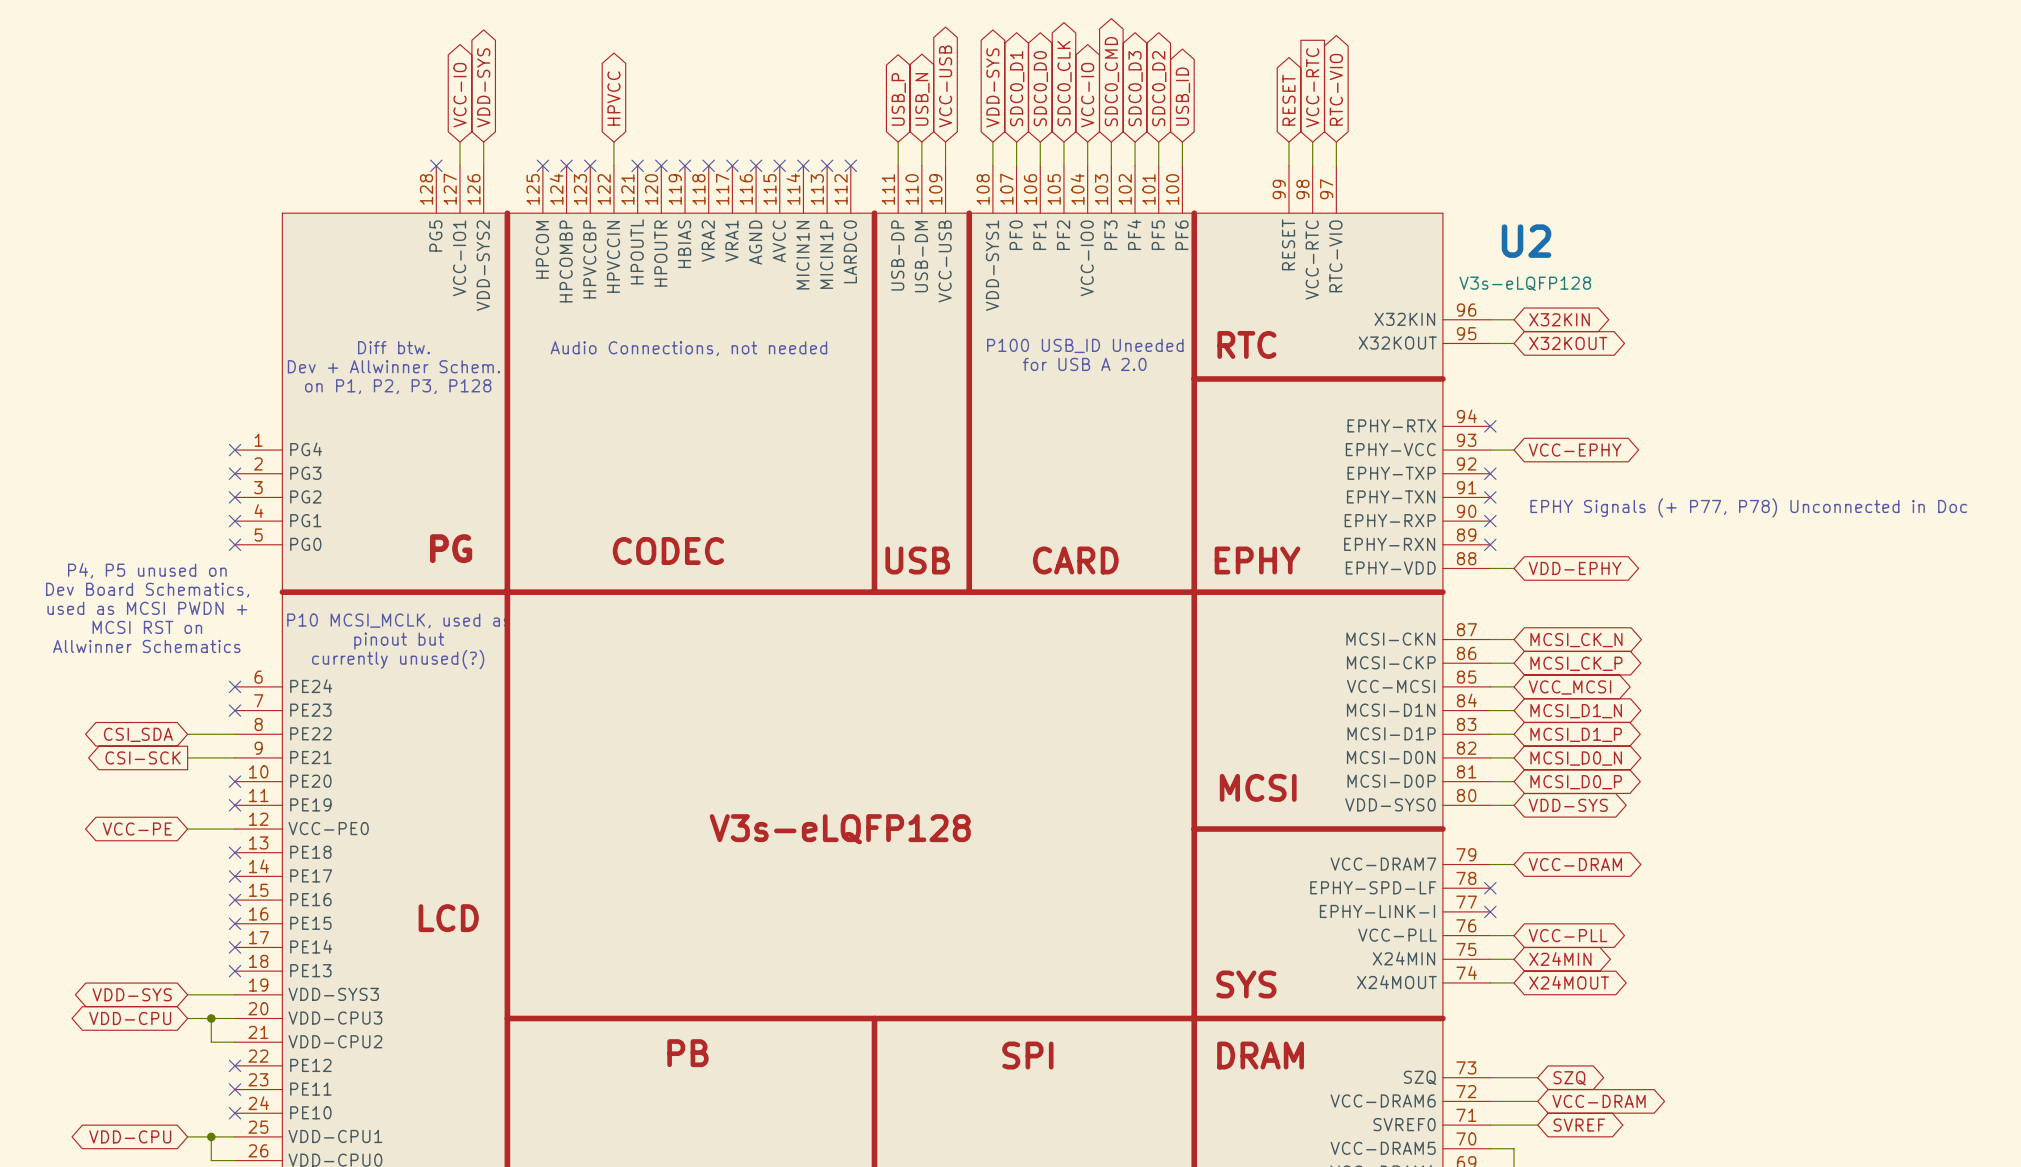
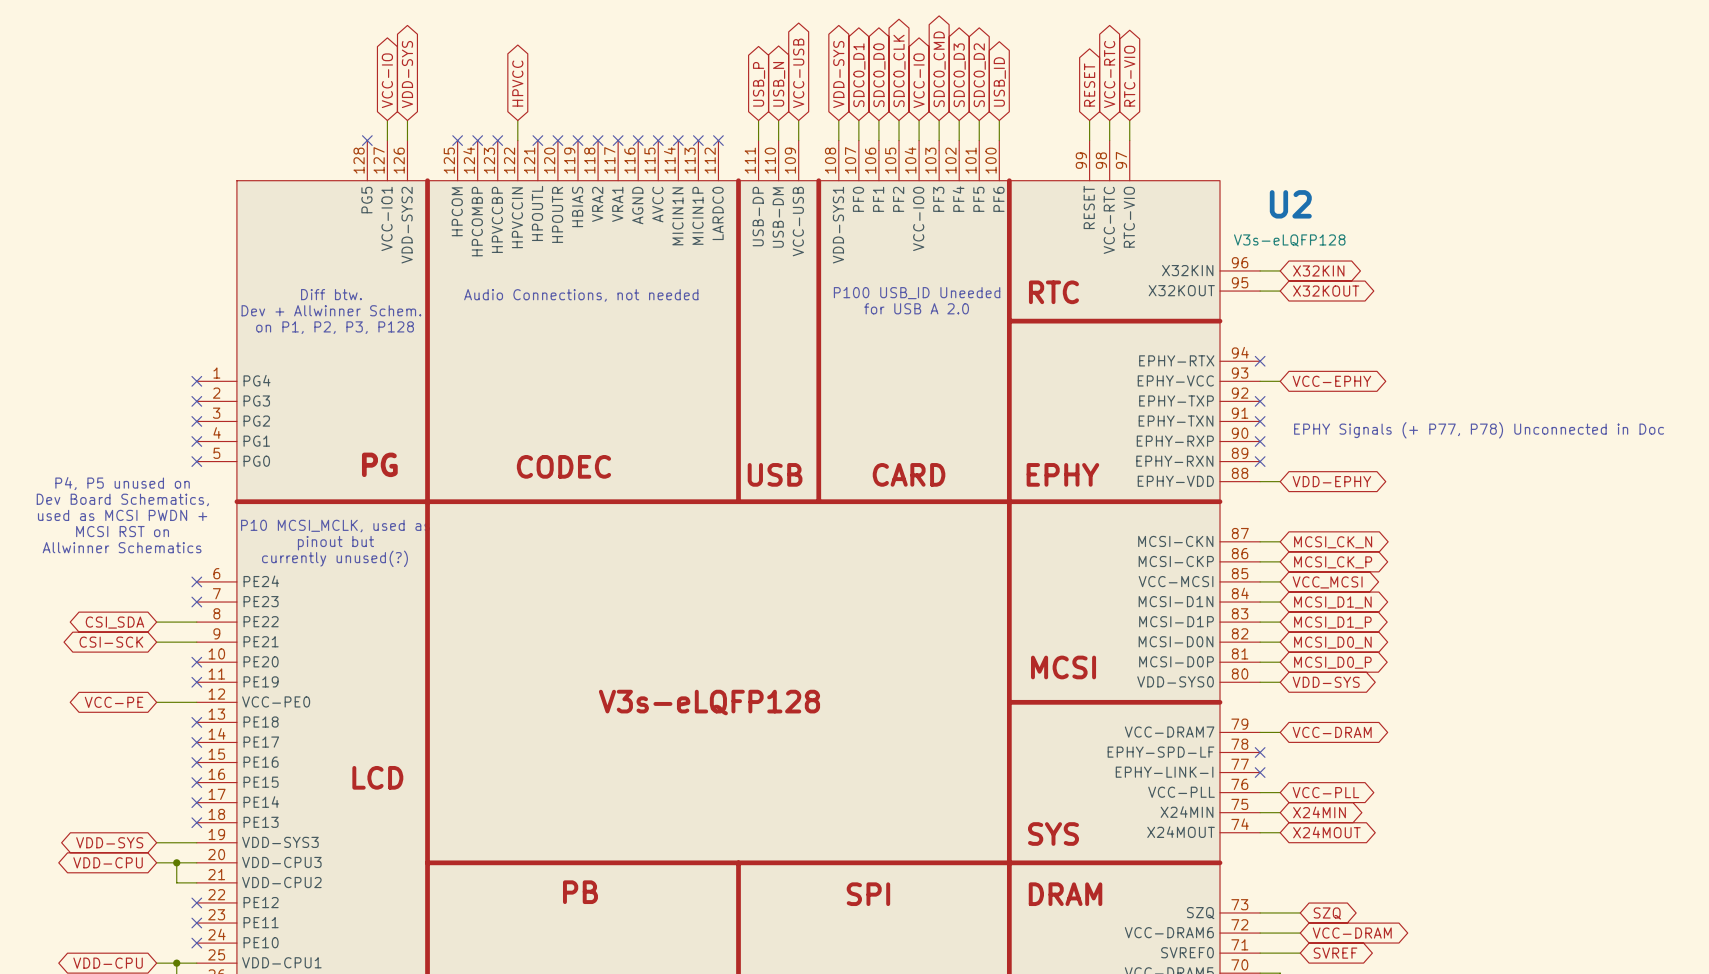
global label shape: input (1312, 87) -> bidirectional (1109, 74)
global label shape: output (143, 757) -> bidirectional (111, 642)

